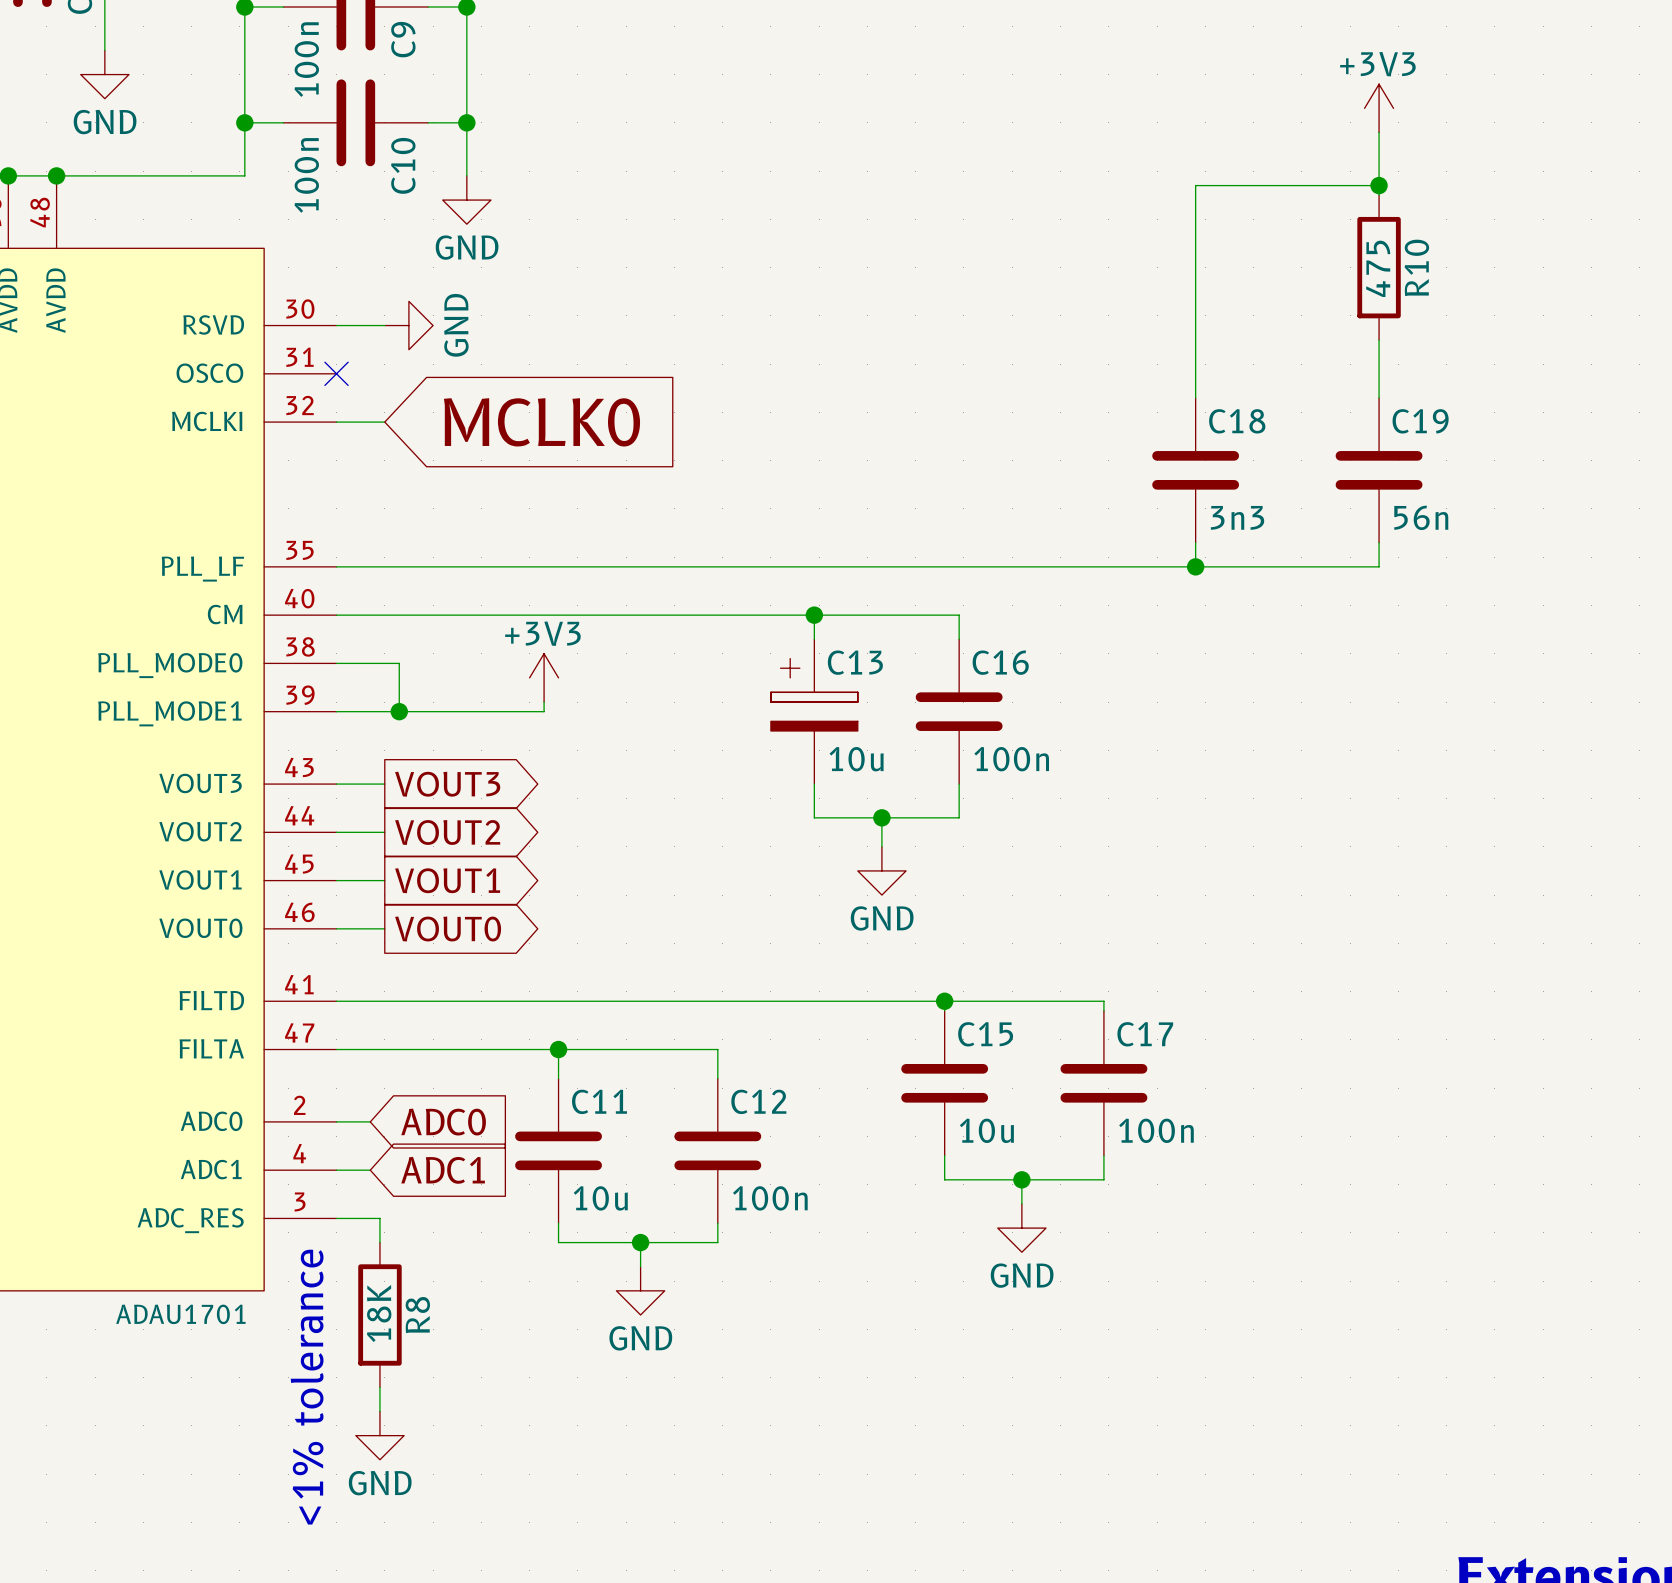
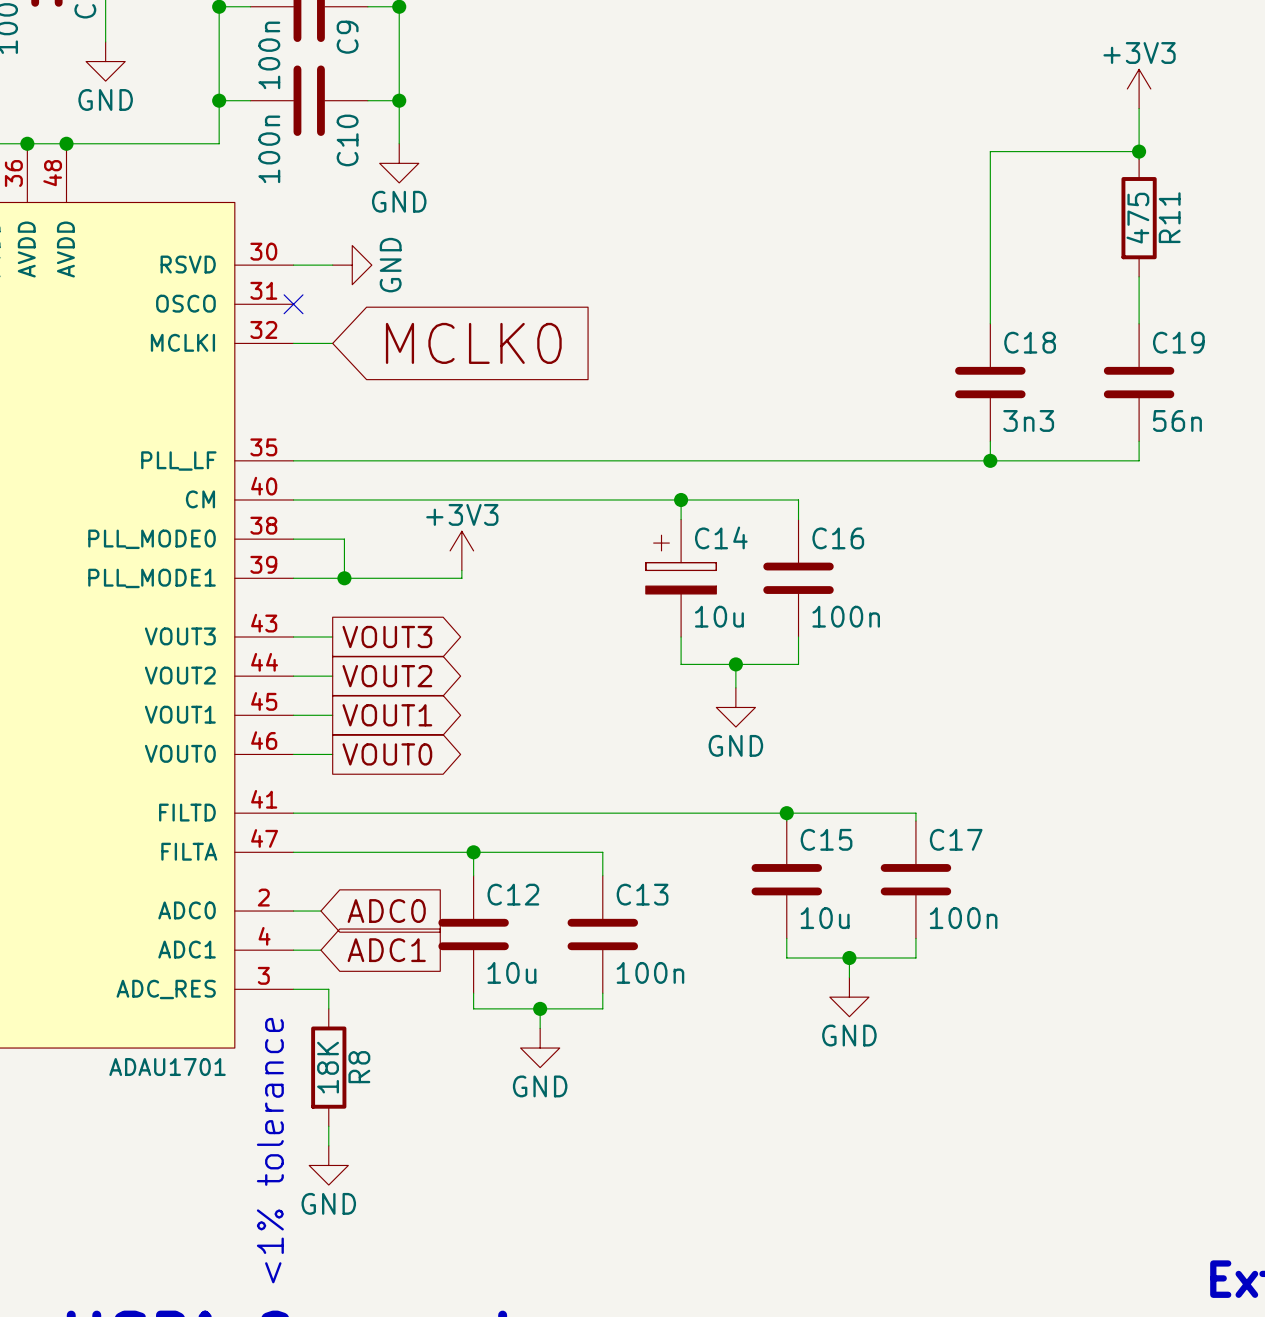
R10 name: R10 (1416, 267) -> R11 (1169, 217)
C13 name: C13 (855, 662) -> C14 (721, 537)
C11 name: C11 (599, 1101) -> C12 (513, 894)
C12 name: C12 (758, 1101) -> C13 (642, 894)

